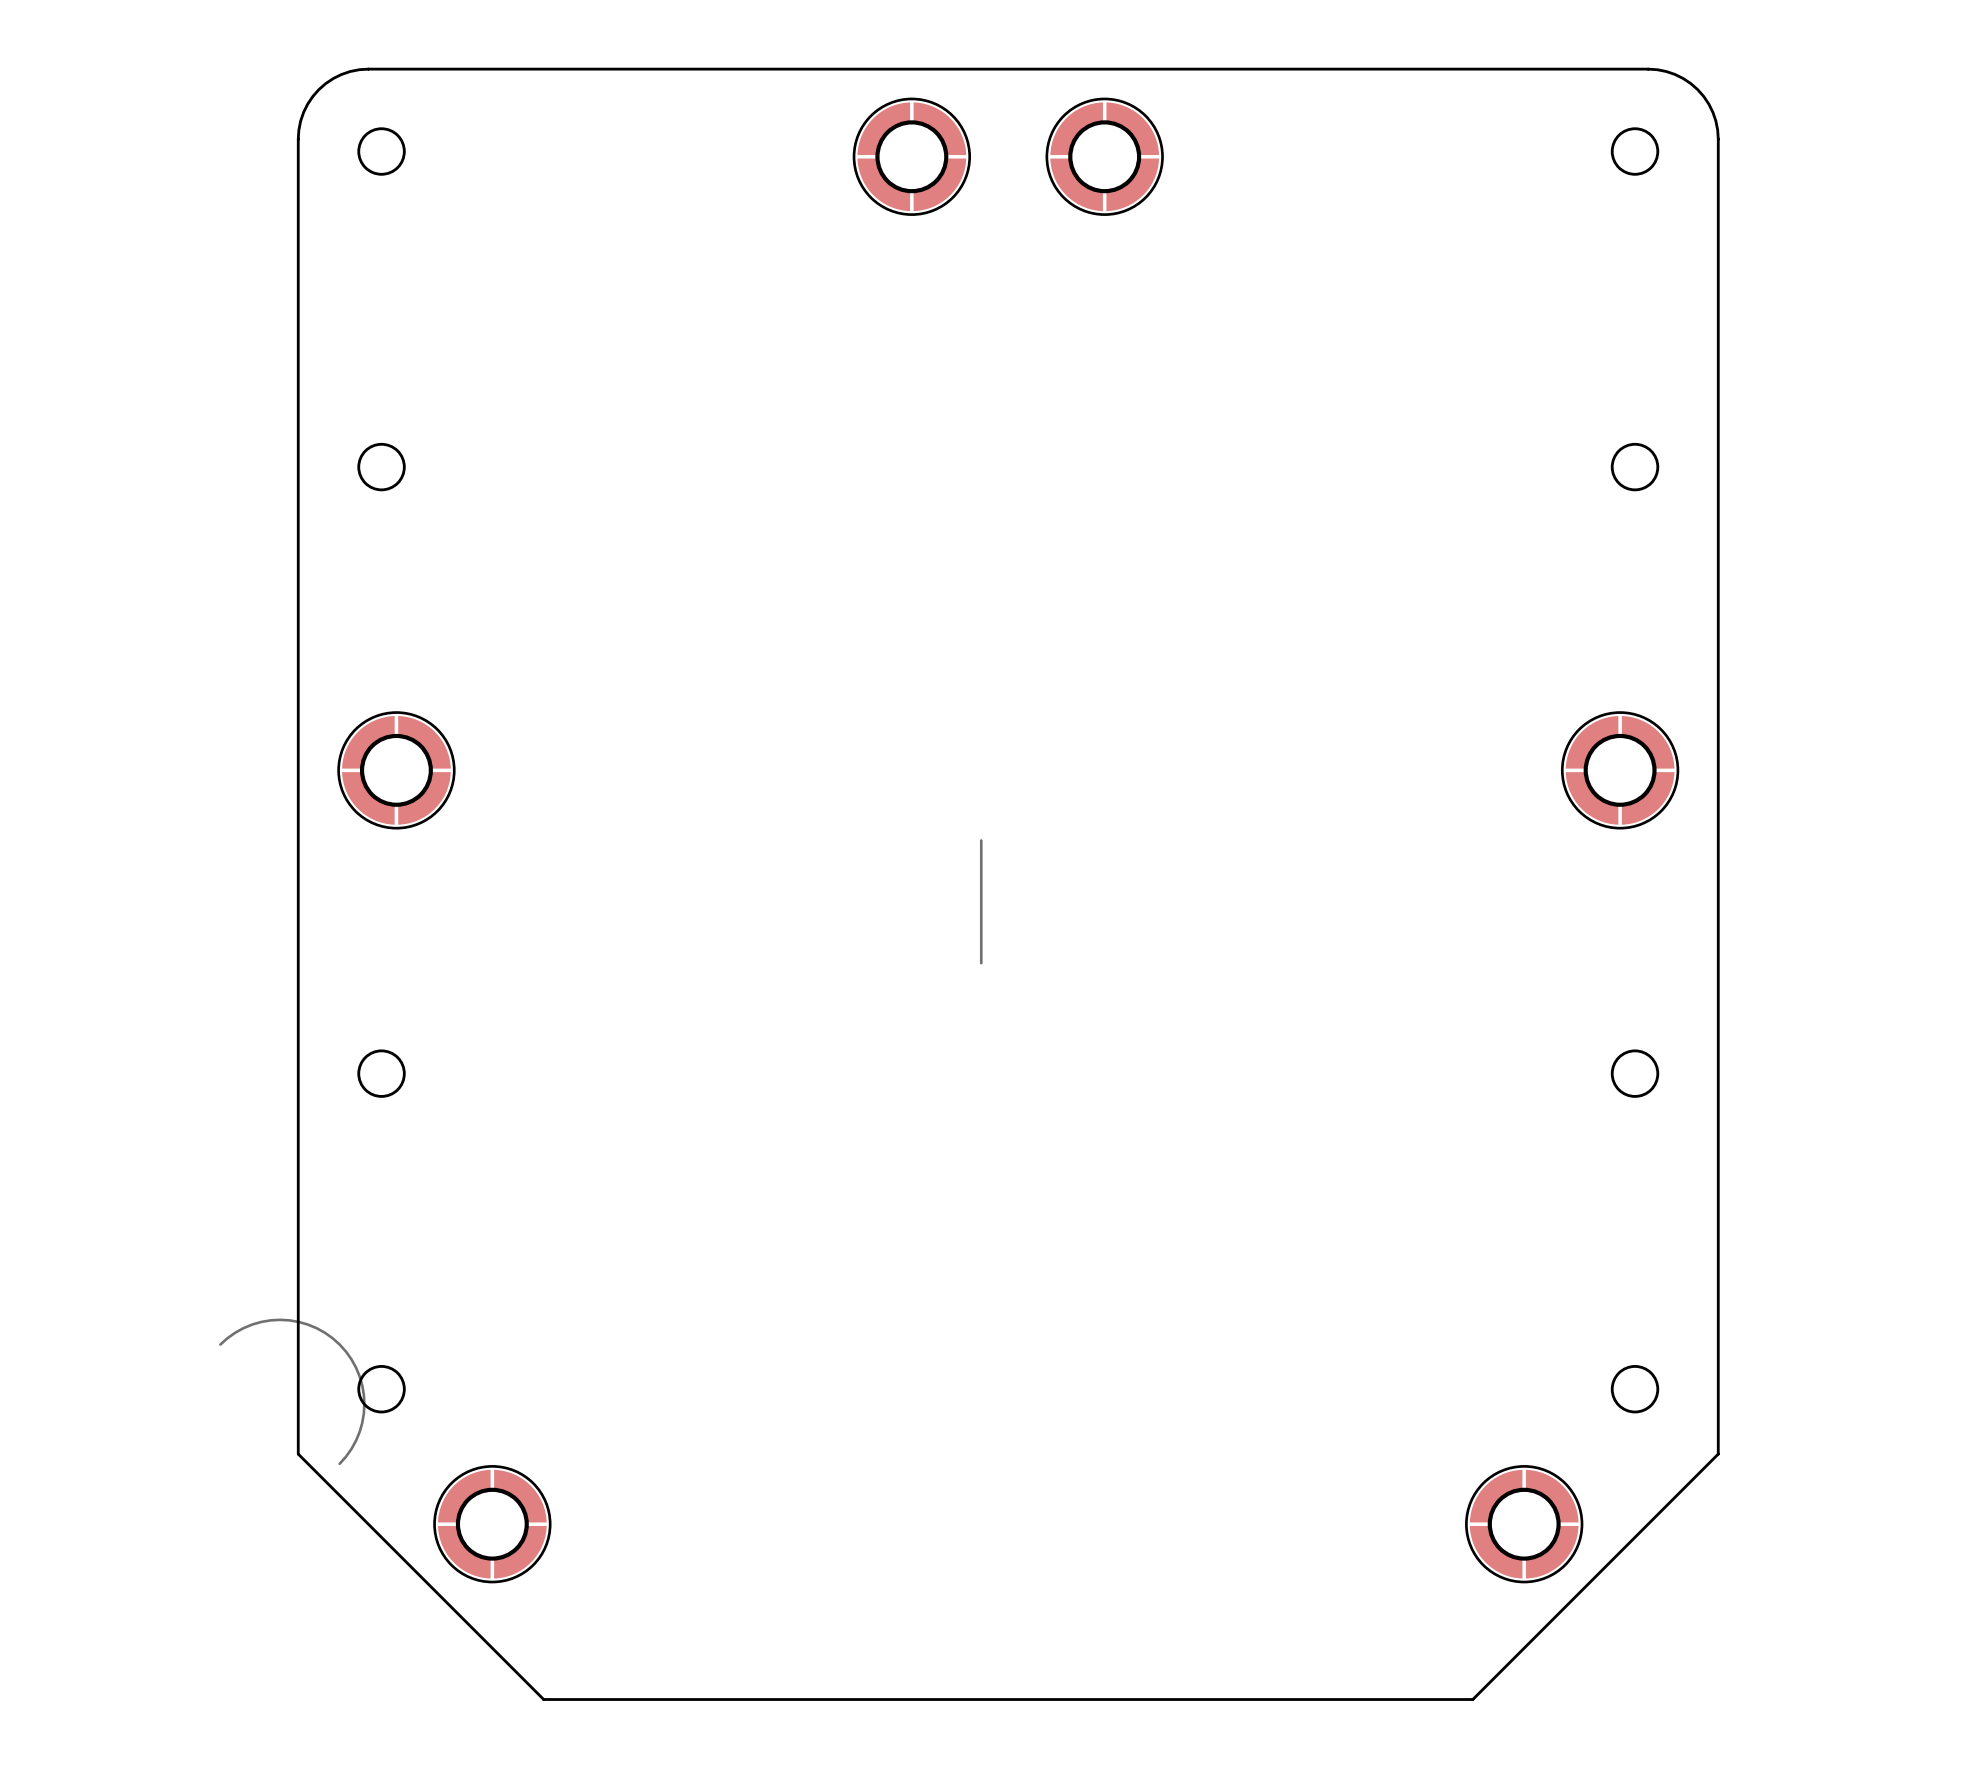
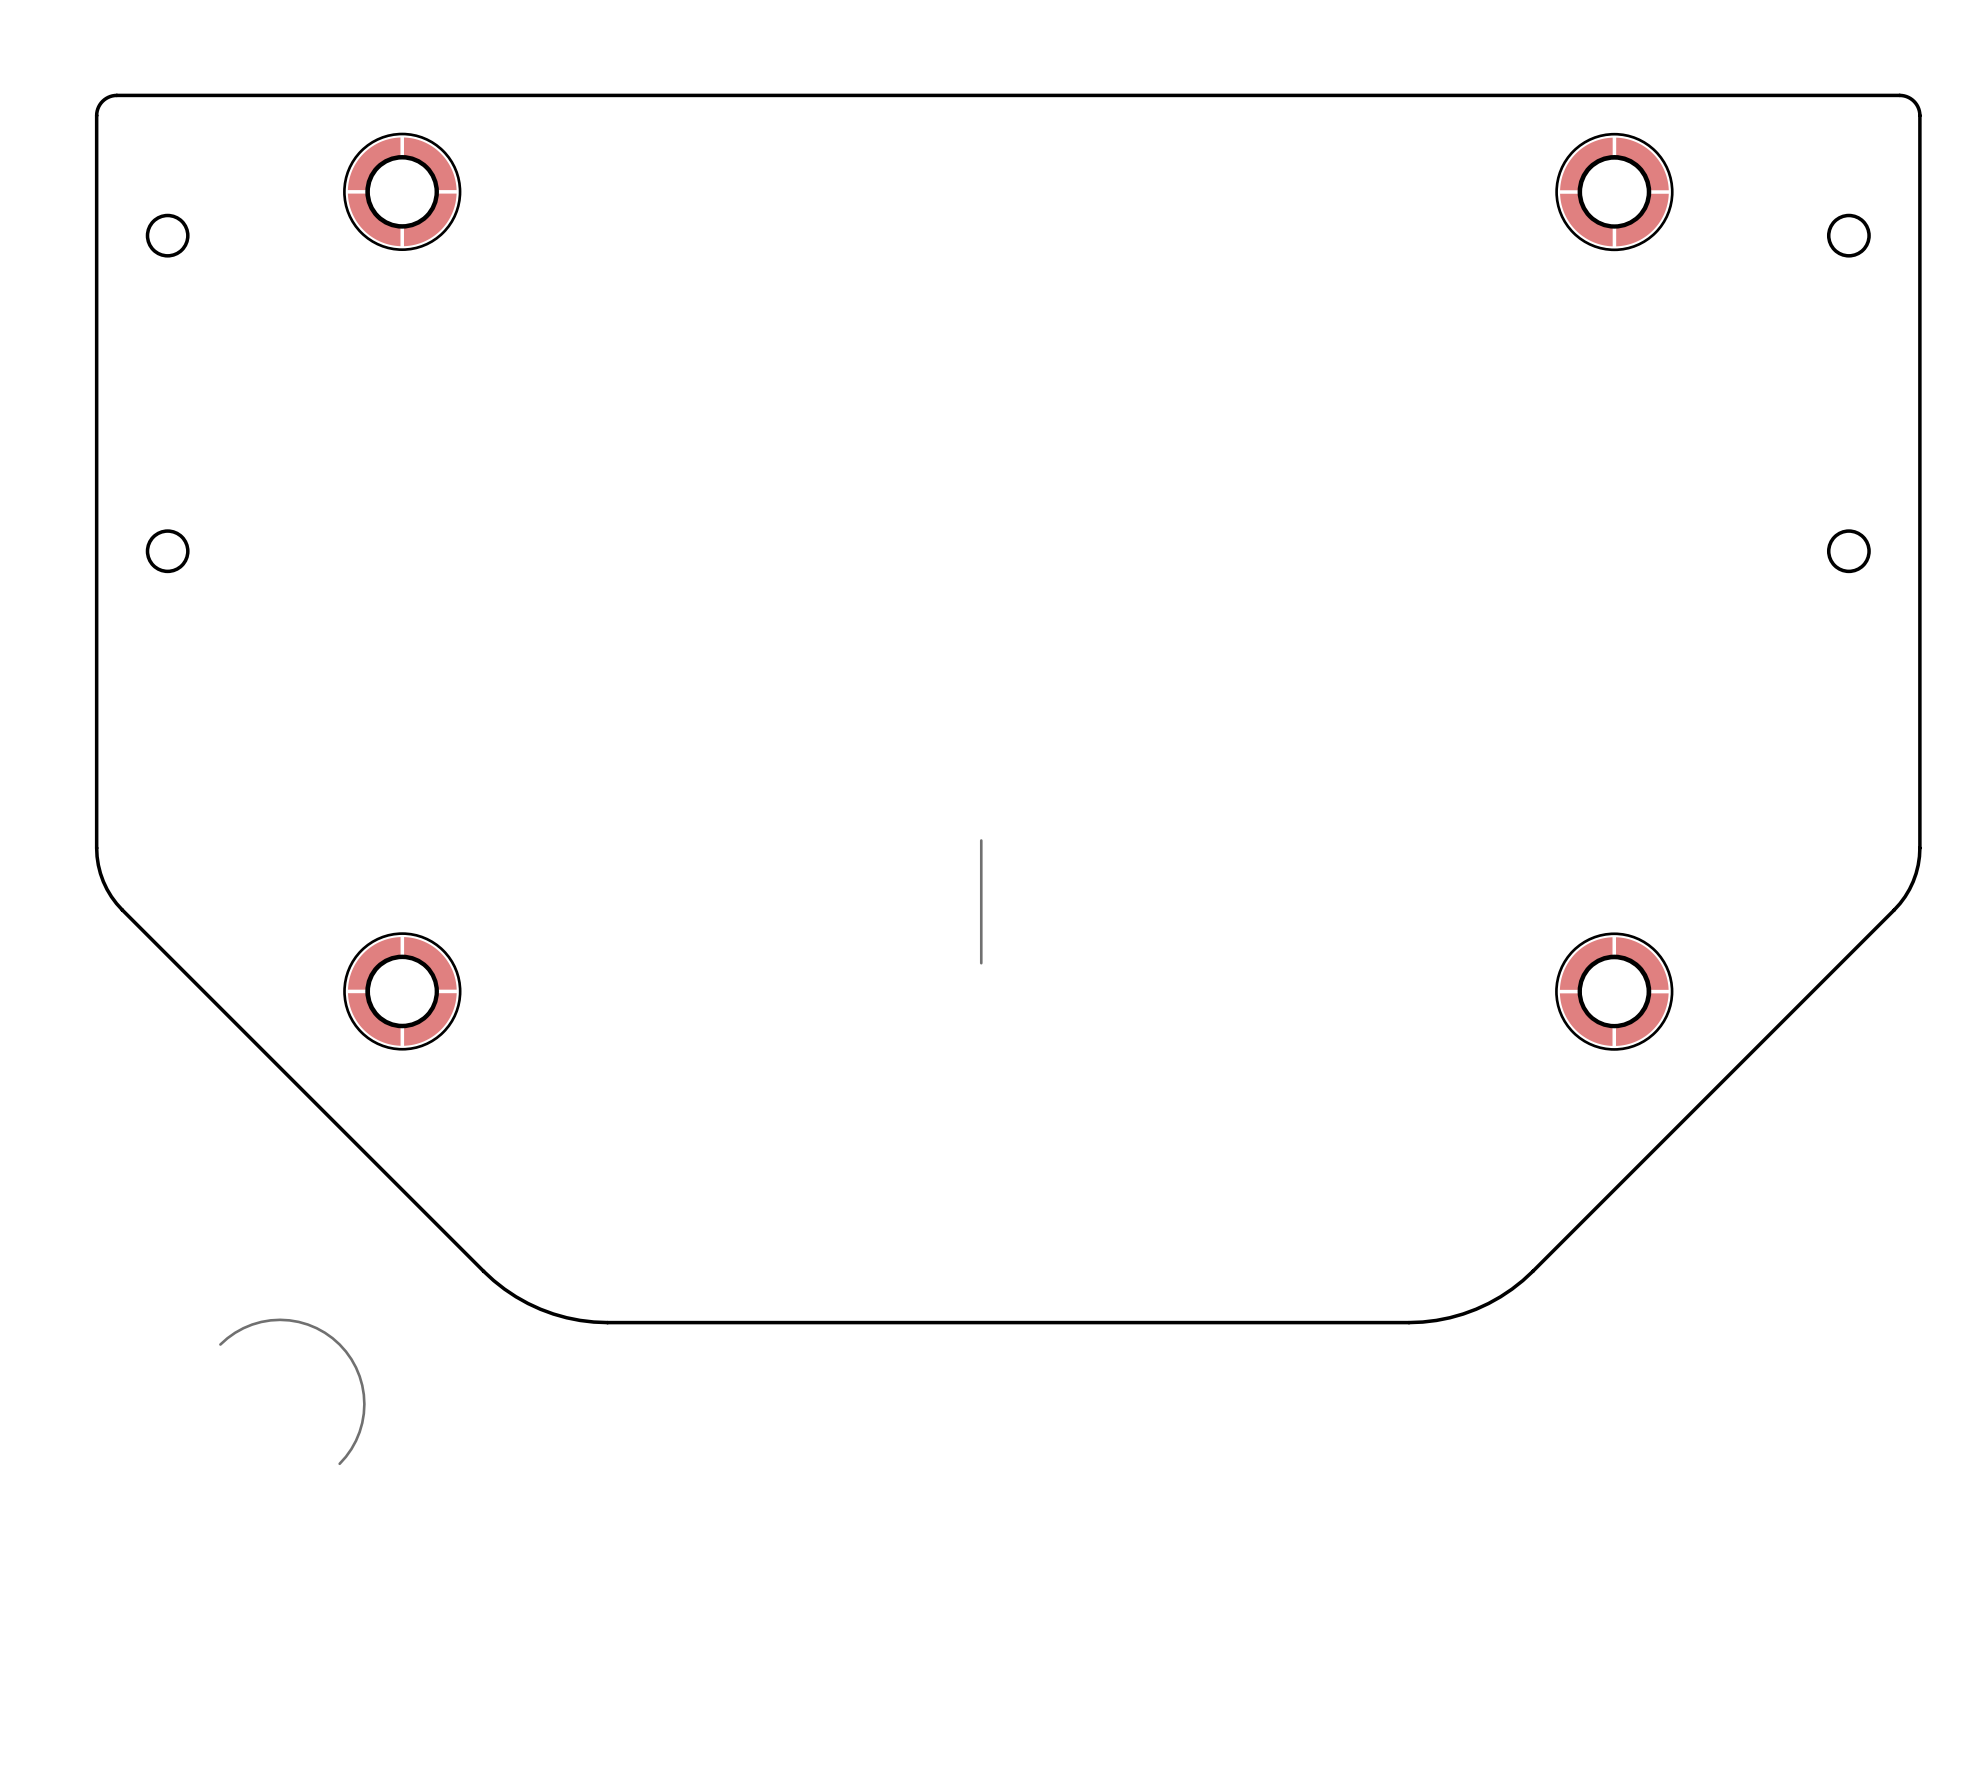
board edge: (368, 69) (1648, 69) (1666, 71) (1683, 78) (1703, 96) (1712, 112) (1718, 139) (1718, 1454) (1472, 1699) (543, 1699) (298, 1454) (298, 139) (303, 112) (318, 89) (341, 74) (368, 69) -> (116, 95) (108, 97) (102, 101) (98, 106) (96, 115) (96, 848) (100, 873) (111, 896) (122, 909) (483, 1271) (504, 1289) (540, 1309) (566, 1317) (607, 1322) (1409, 1322) (1436, 1320) (1463, 1314) (1500, 1296) (1532, 1271) (1894, 909) (1905, 896) (1913, 881) (1918, 865) (1919, 848) (1919, 115) (1916, 104) (1908, 97) (1899, 95) (116, 95)
round board edge: [875, 120, 949, 194] -> none
round board edge: [1068, 120, 1142, 194] -> none
round board edge: [357, 127, 406, 176] -> none
round board edge: [1610, 127, 1660, 176] -> none
round board edge: none -> [365, 155, 439, 229]
round board edge: none -> [1577, 155, 1652, 229]
part: (911, 156) -> none
part: (1104, 156) -> none
part: none -> (402, 191)
part: none -> (1614, 192)
round board edge: none -> [145, 213, 190, 258]
round board edge: none -> [1826, 213, 1871, 258]
round board edge: [357, 442, 406, 492] -> none
round board edge: [1610, 442, 1660, 492] -> none
round board edge: none -> [145, 529, 190, 574]
round board edge: none -> [1826, 529, 1871, 574]
round board edge: [359, 733, 433, 807] -> none
round board edge: [1583, 733, 1657, 807] -> none
part position: (396, 770) -> (402, 991)
part position: (1620, 770) -> (1614, 991)
round board edge: none -> [365, 954, 439, 1029]
round board edge: none -> [1577, 954, 1652, 1029]
round board edge: [357, 1049, 406, 1098] -> none
round board edge: [1610, 1049, 1660, 1098] -> none
round board edge: [357, 1365, 406, 1414] -> none
round board edge: [1610, 1365, 1660, 1414] -> none
round board edge: [455, 1487, 529, 1561] -> none
round board edge: [1487, 1487, 1561, 1561] -> none
part: (492, 1524) -> none
part: (1524, 1524) -> none

